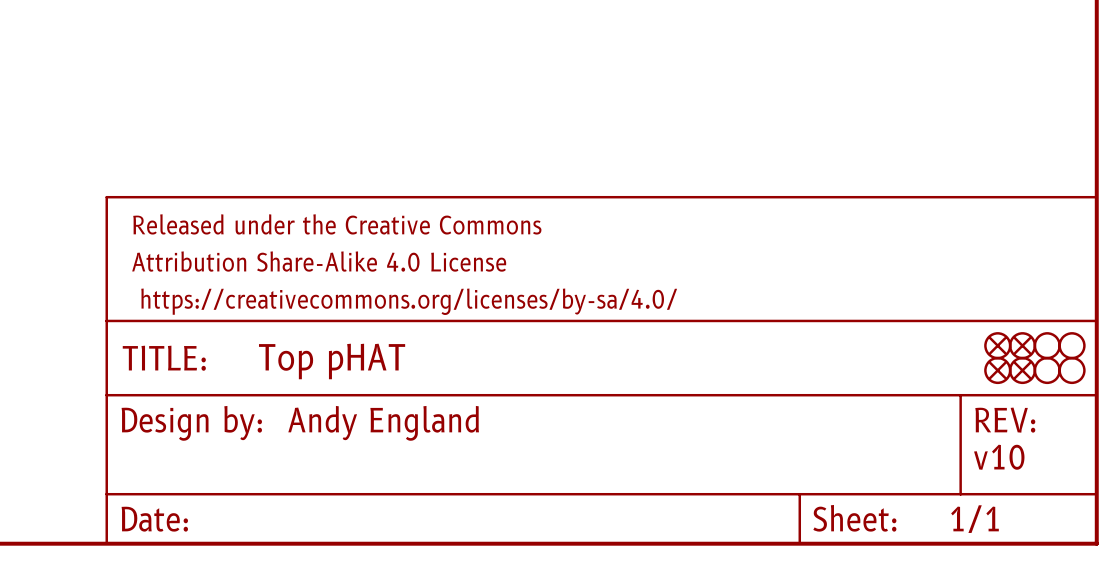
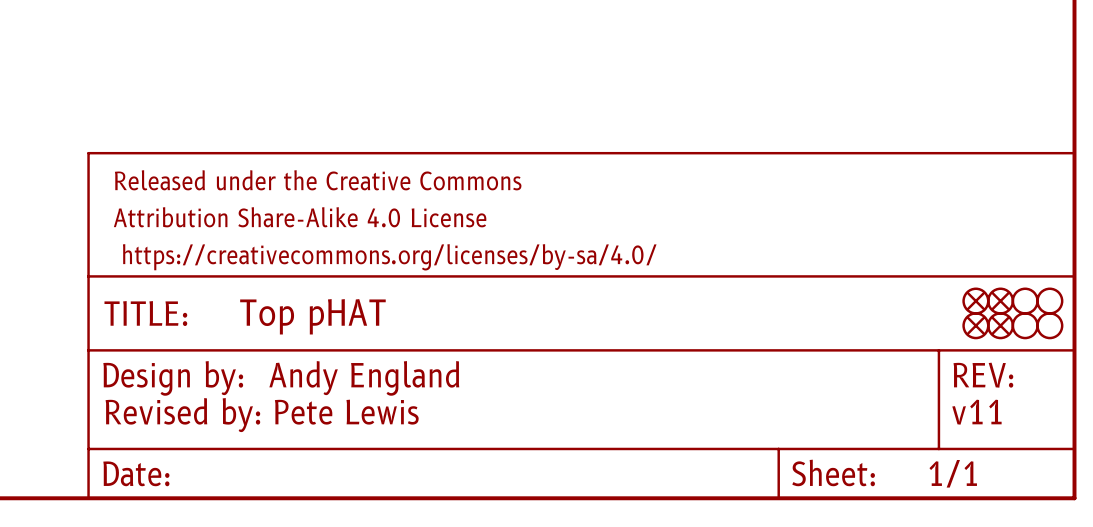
text: v10 (999, 457) -> v11 (976, 412)
text: none -> Revised by: Pete Lewis (262, 415)

